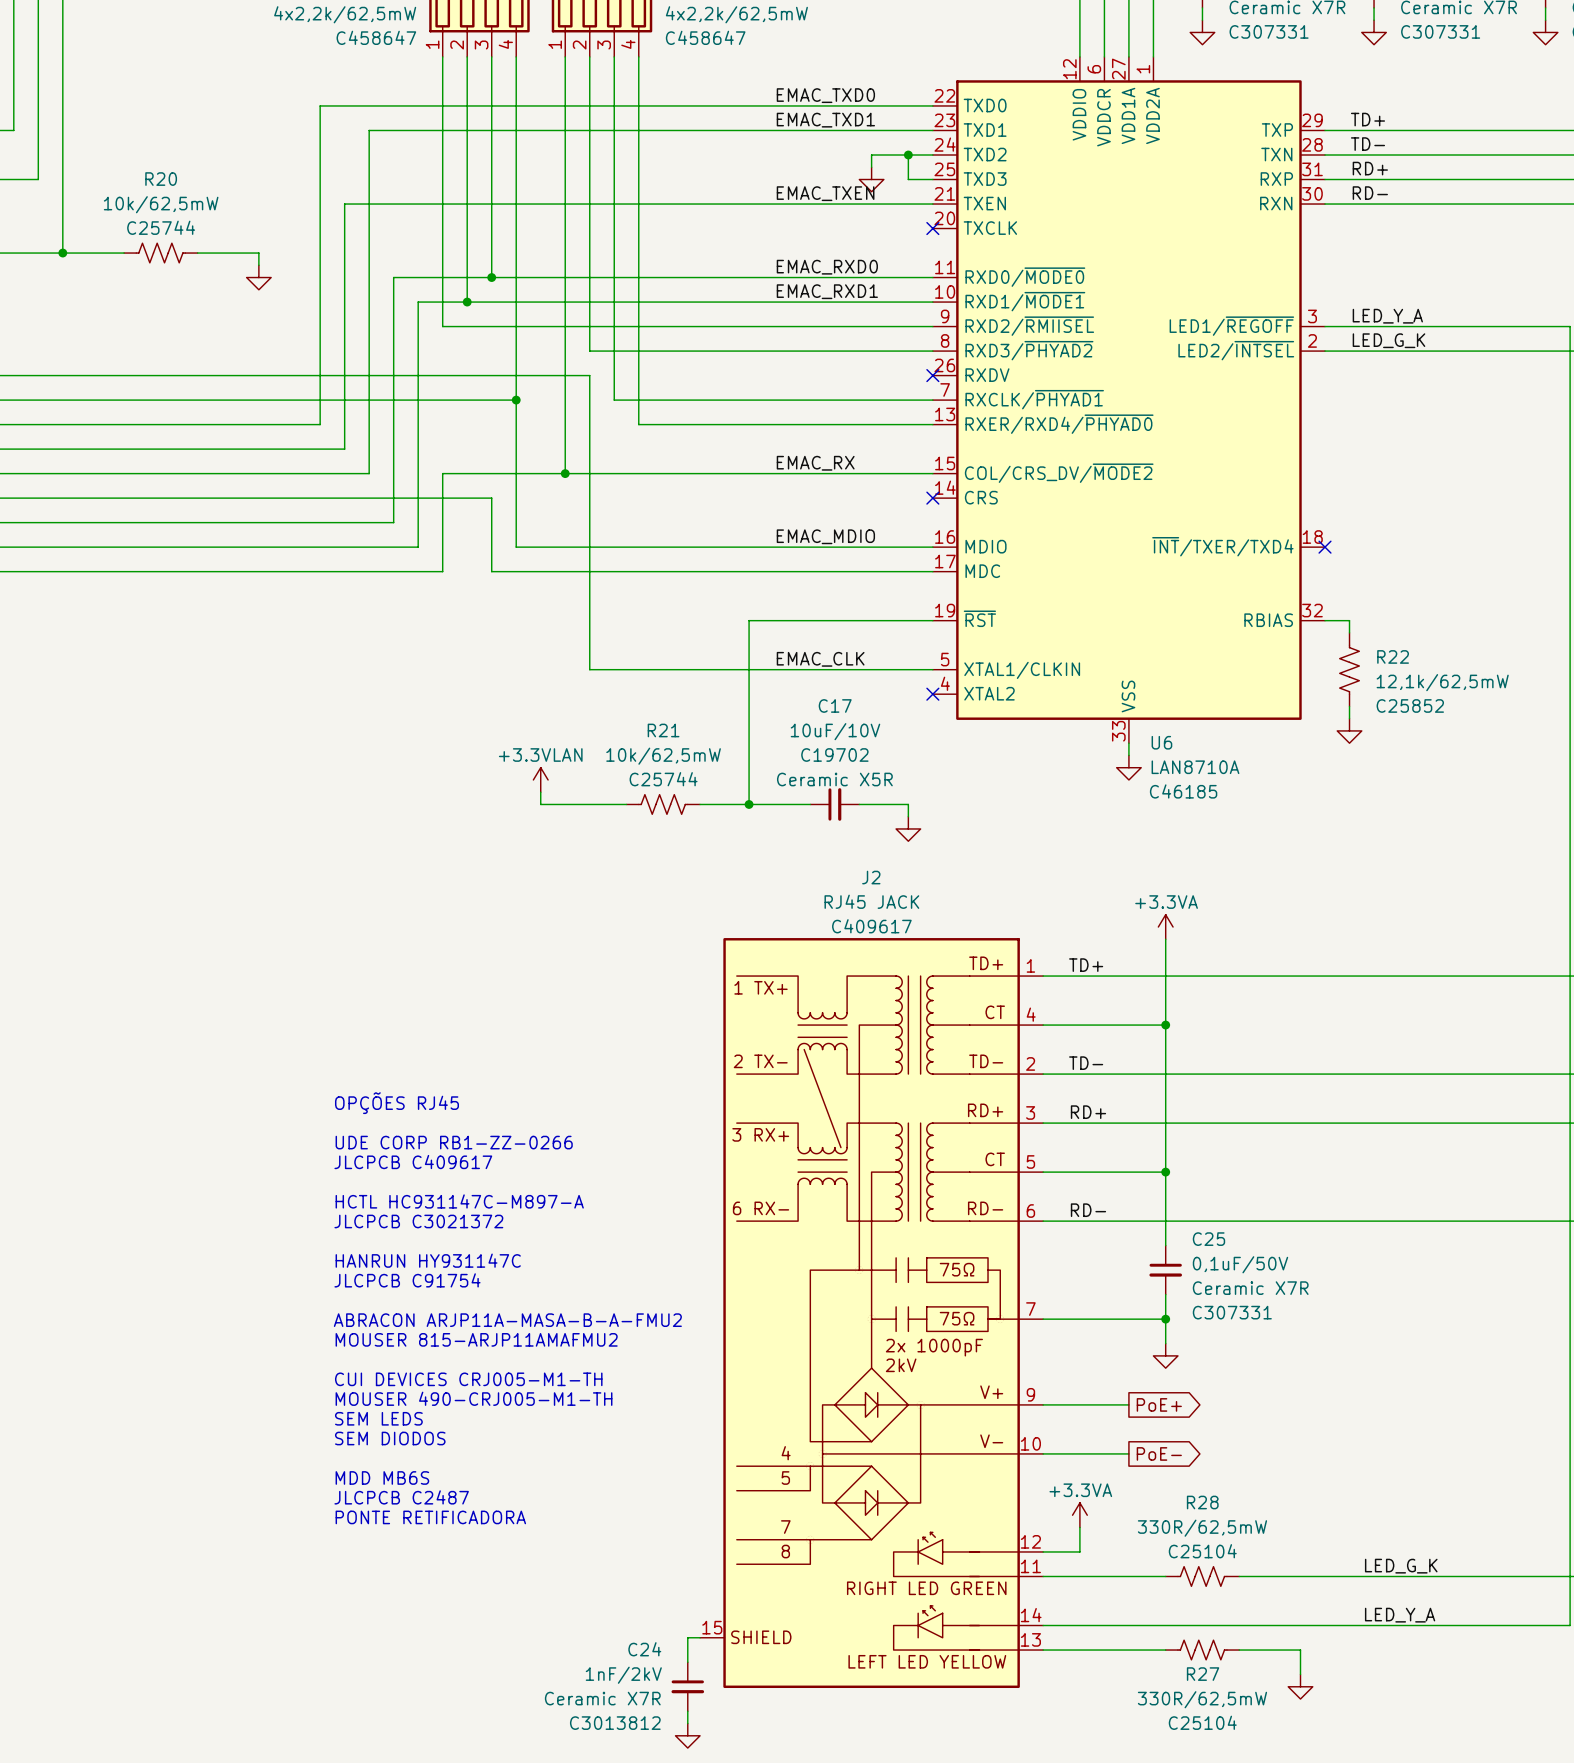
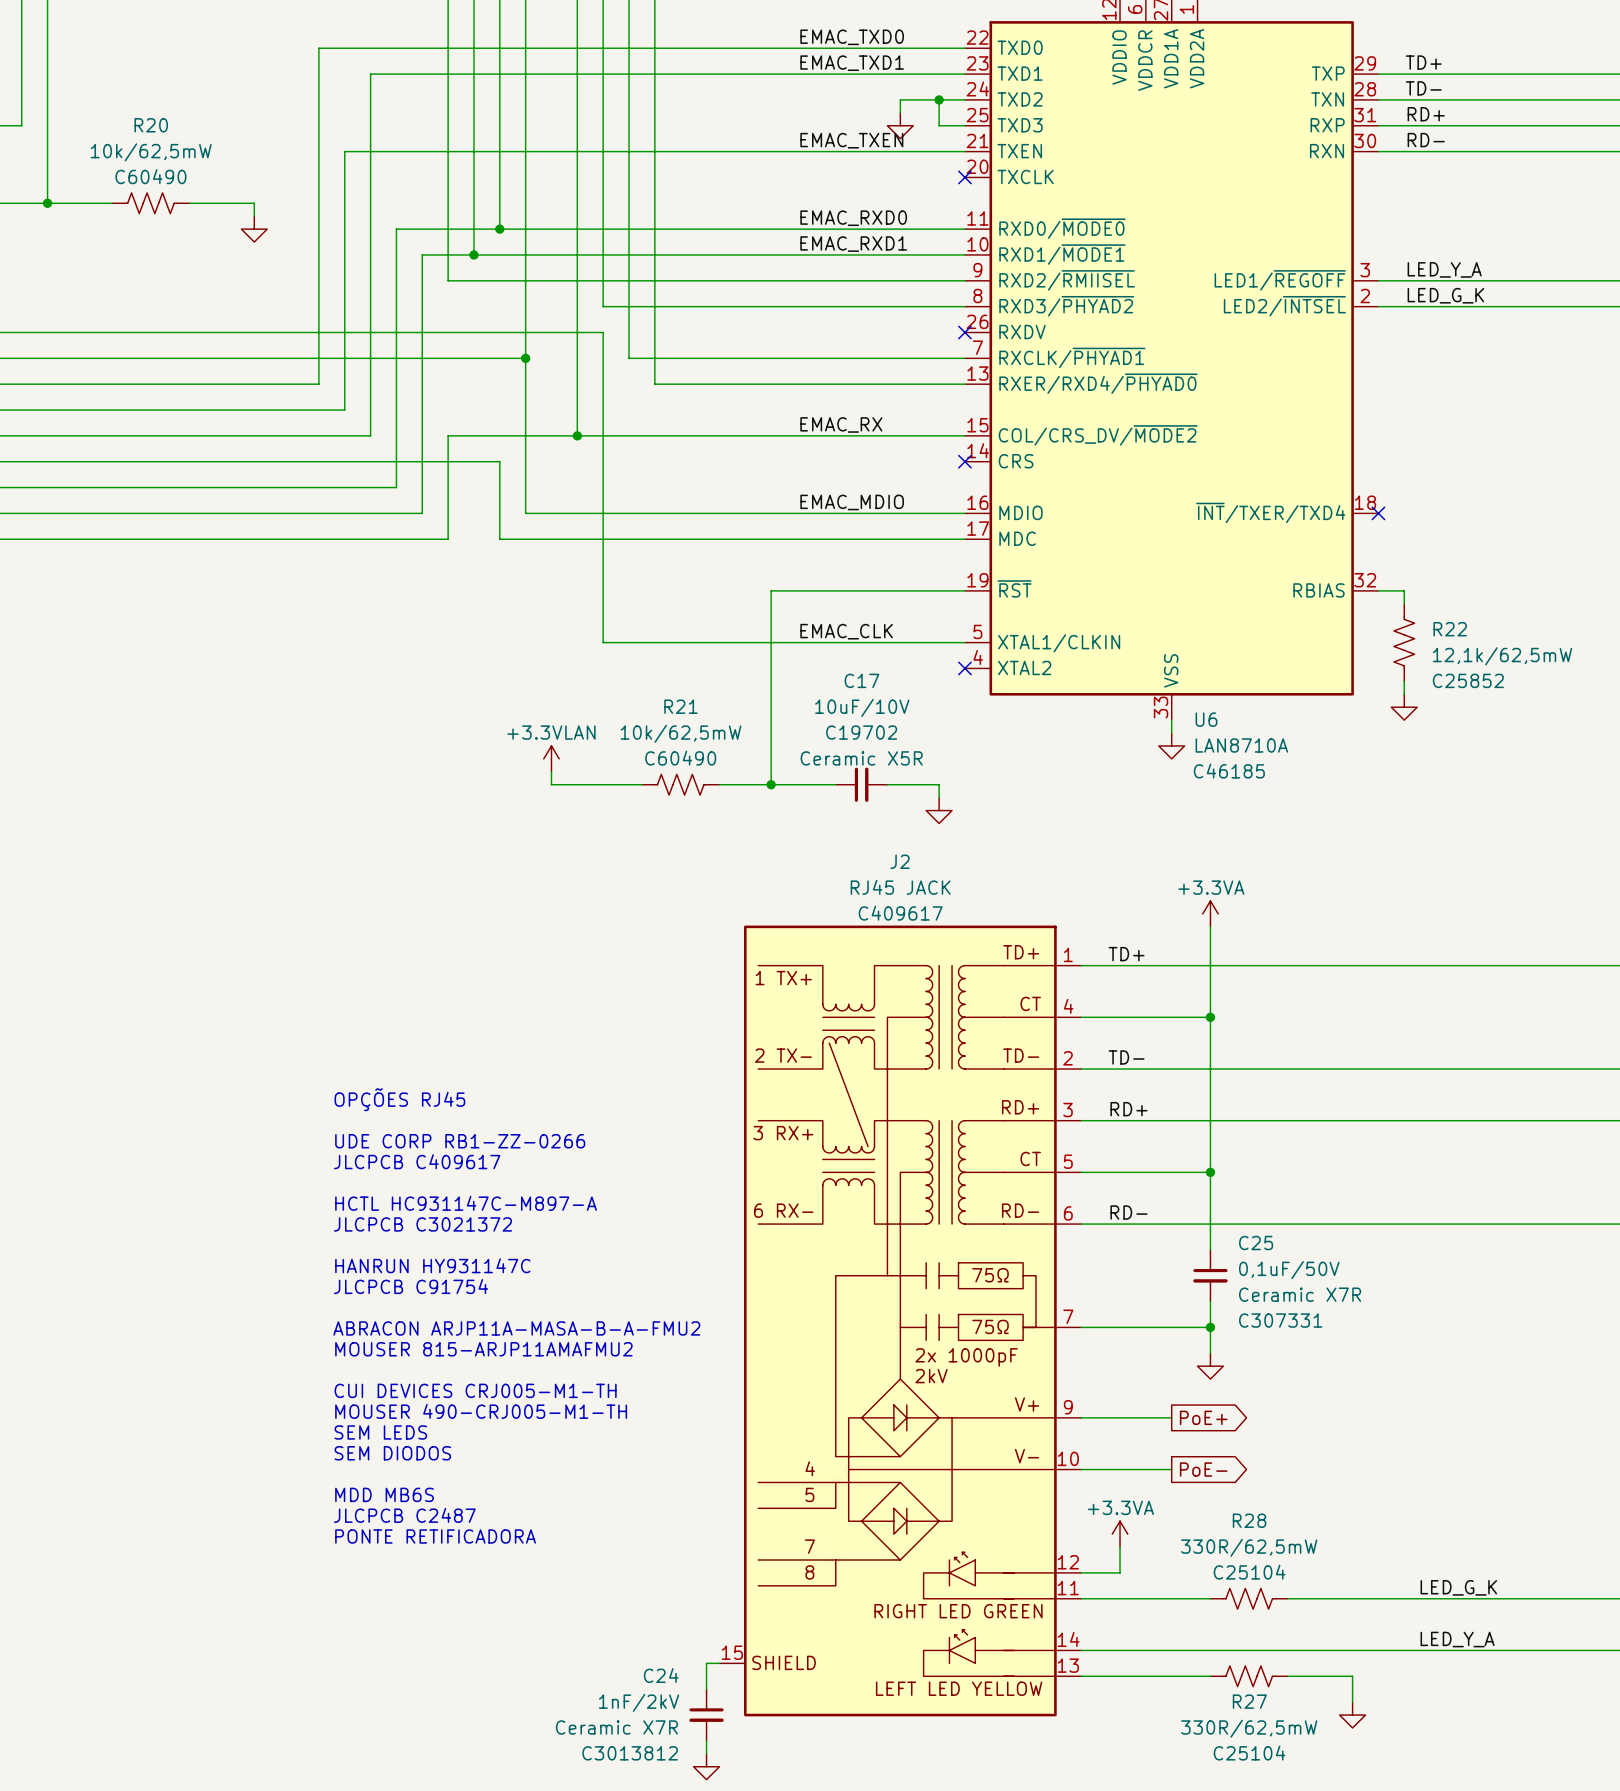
R20 text: C25744 (161, 227) -> C60490 (150, 176)
R21 text: C25744 (663, 779) -> C60490 (680, 758)

